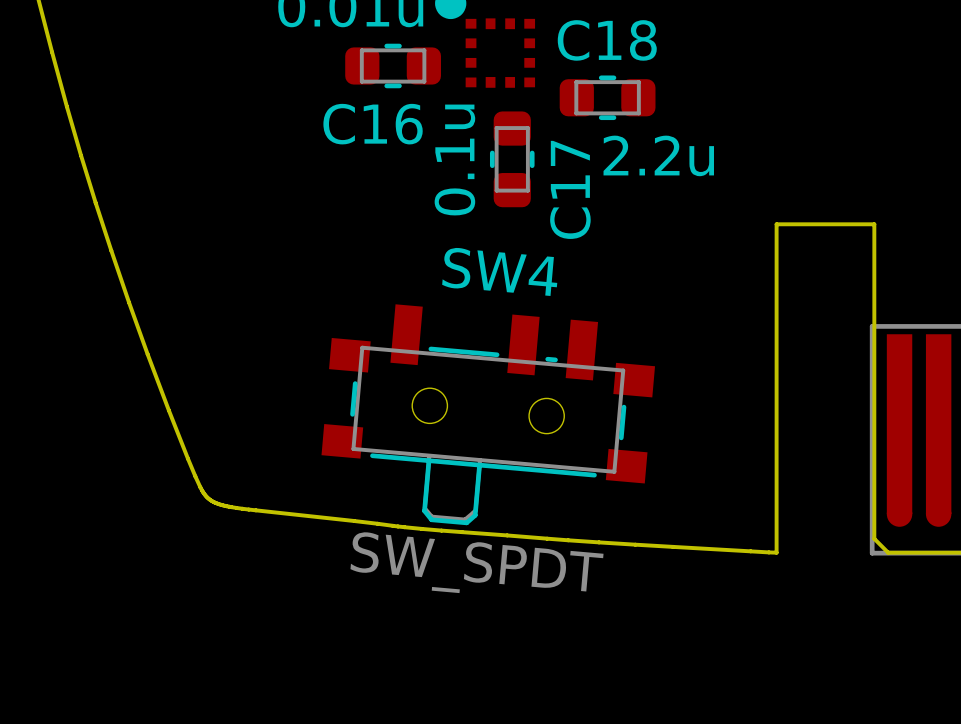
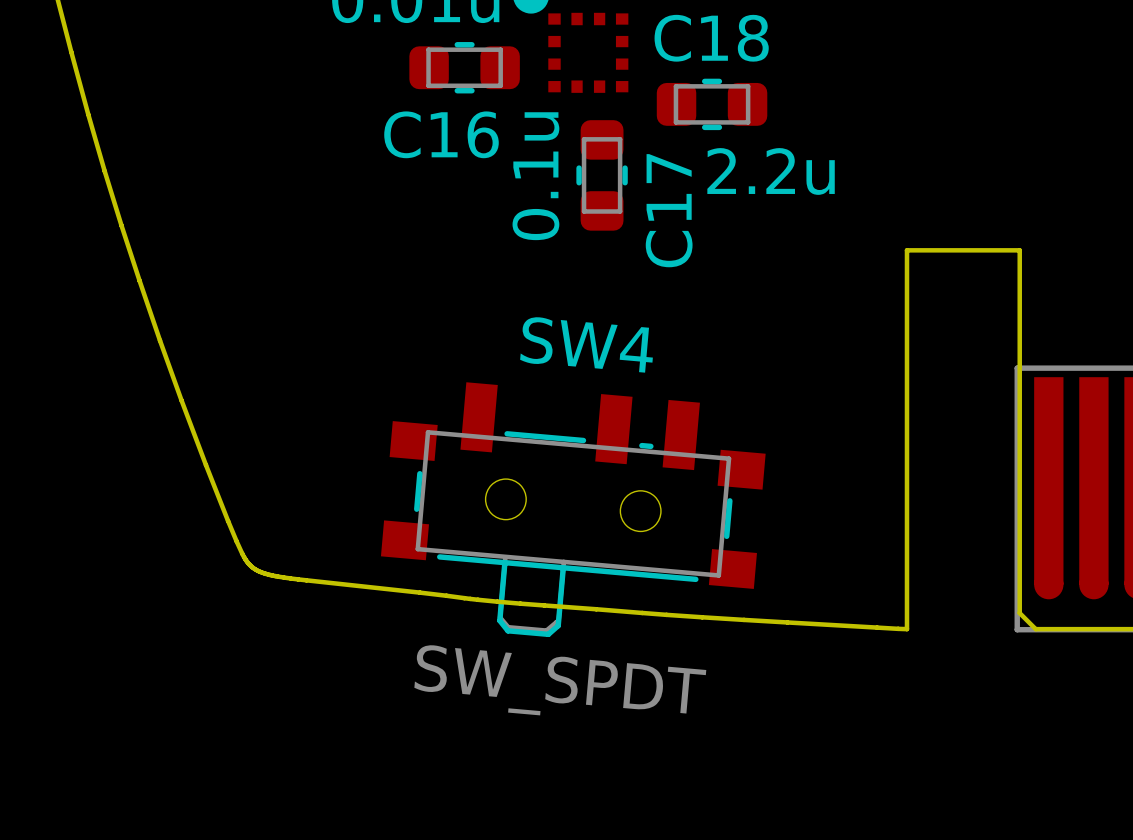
SW4 position: (488, 414) -> (573, 509)

